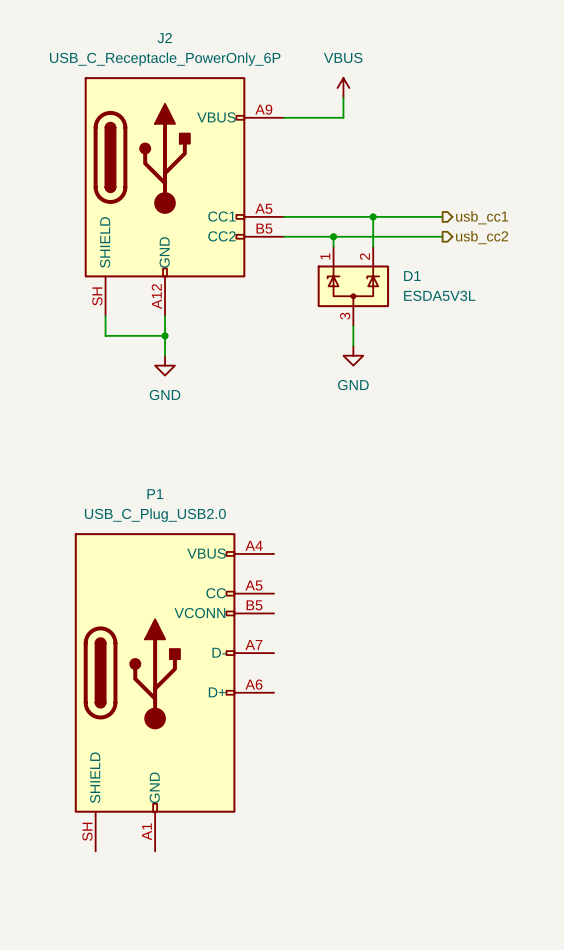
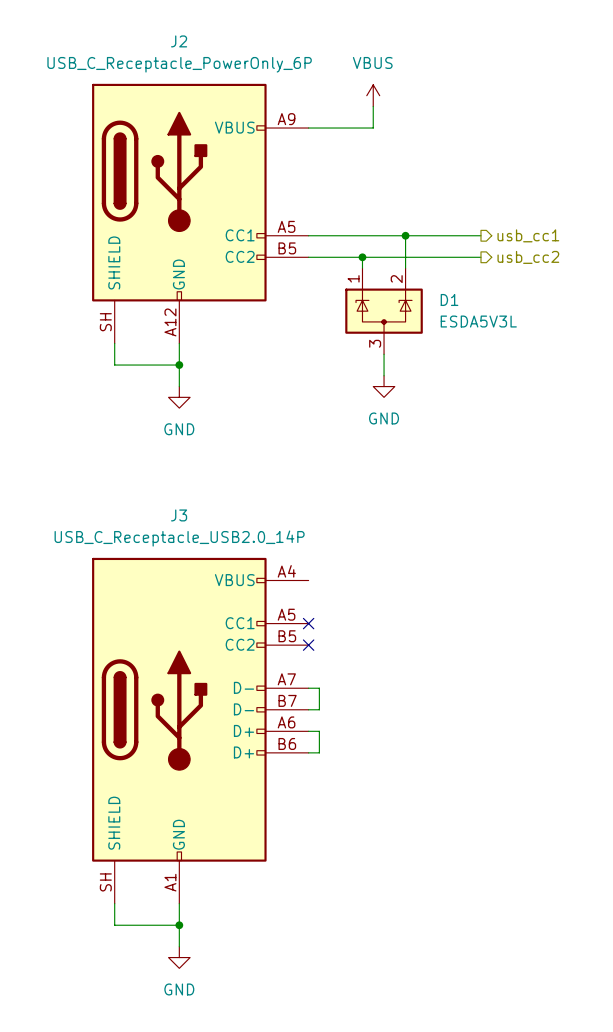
no-connect mark: none -> (308, 623)
no-connect mark: none -> (308, 645)
wire: none -> (308, 688) (319, 688) (319, 709) (308, 709)
J3: none -> USB_C_Receptacle_USB2.0_14P (200, 730)
wire: none -> (308, 731) (319, 731) (319, 752) (308, 752)
P1: USB_C_Plug_USB2.0 (174, 692) -> none
wire: none -> (114, 903) (114, 925) (179, 925)
wire: none -> (179, 903) (179, 946)
junction: none -> (179, 925)
power symbol: none -> GND (179, 957)

